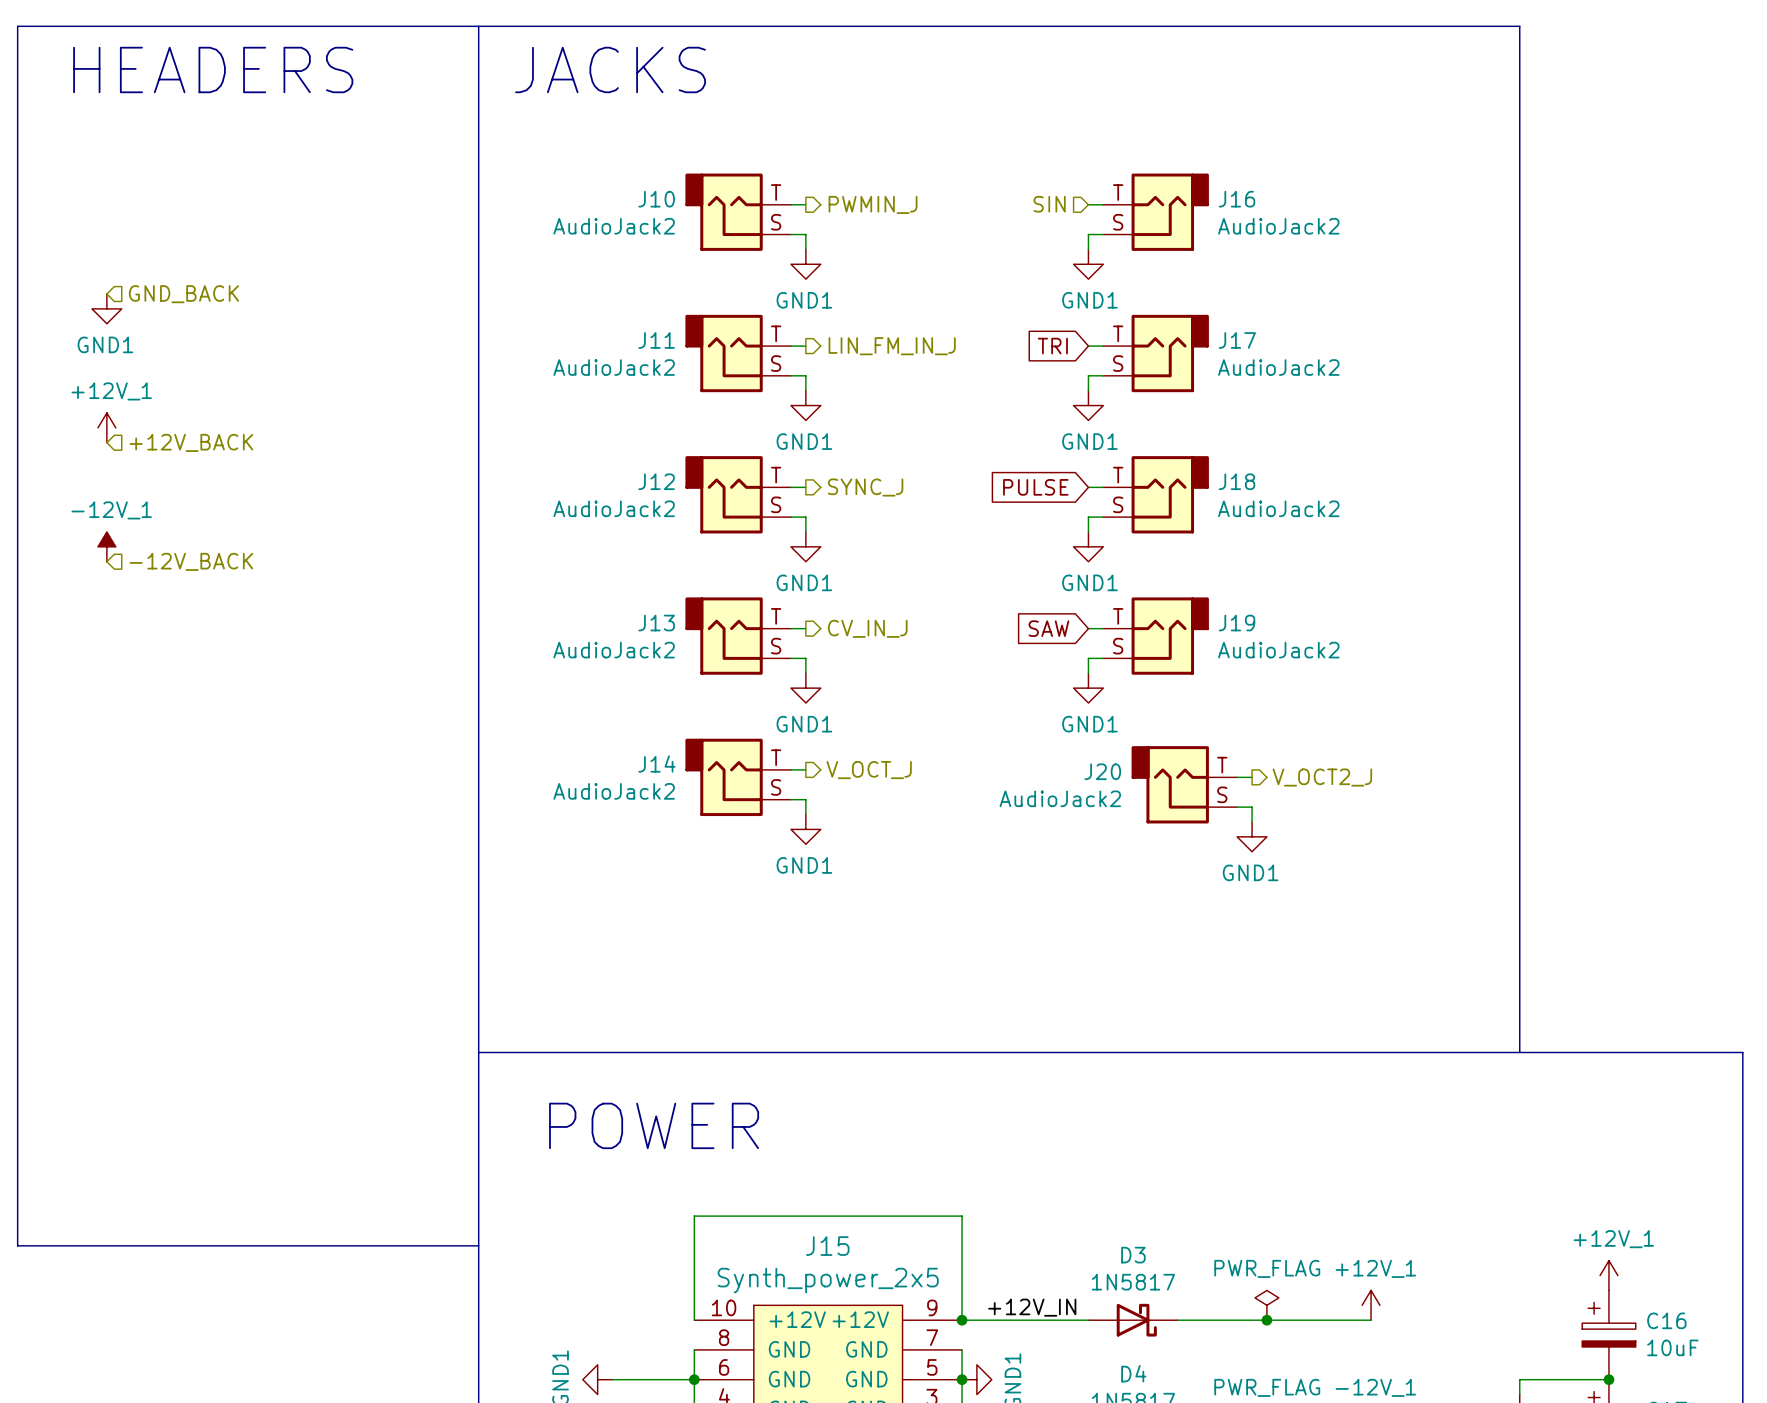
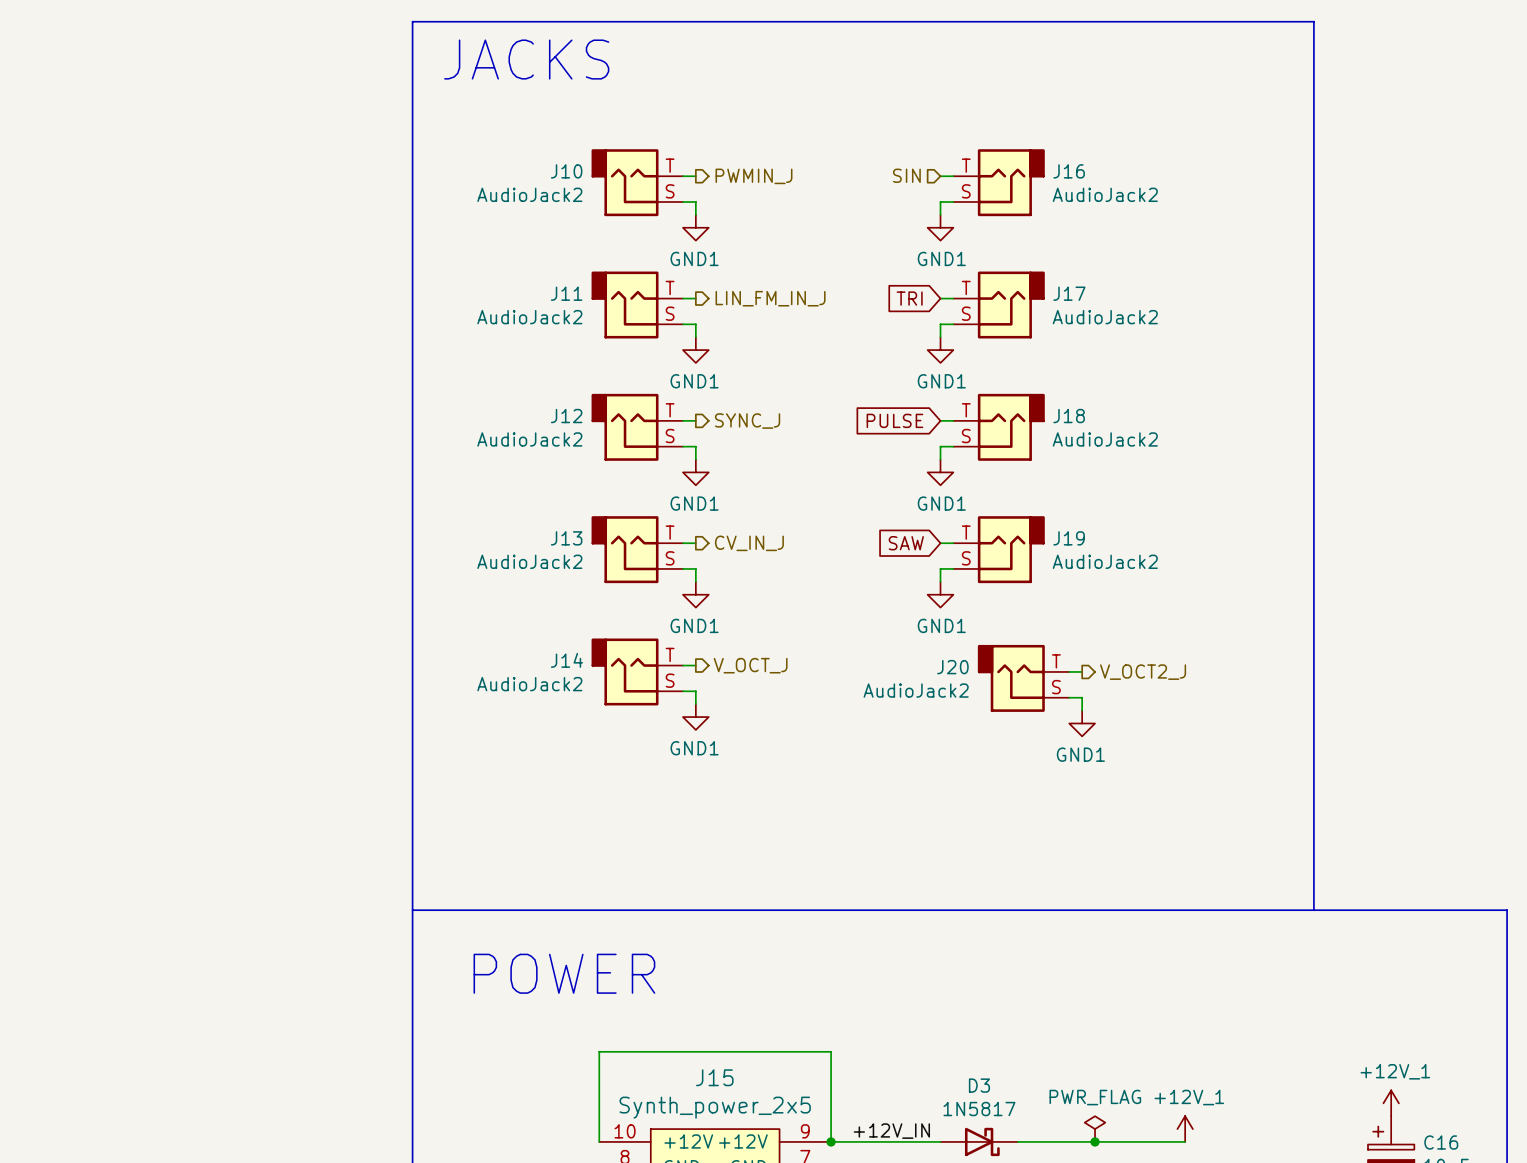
line: (478, 26) (17, 26) (17, 1245) (478, 1245) -> none
text: HEADERS (213, 69) -> none
hierarchical label: GND_BACK (183, 294) -> none
power symbol: GND1 (106, 308) -> none
power symbol: +12V_1 (106, 427) -> none
hierarchical label: +12V_BACK (191, 442) -> none
power symbol: -12V_1 (106, 546) -> none
hierarchical label: -12V_BACK (191, 561) -> none

